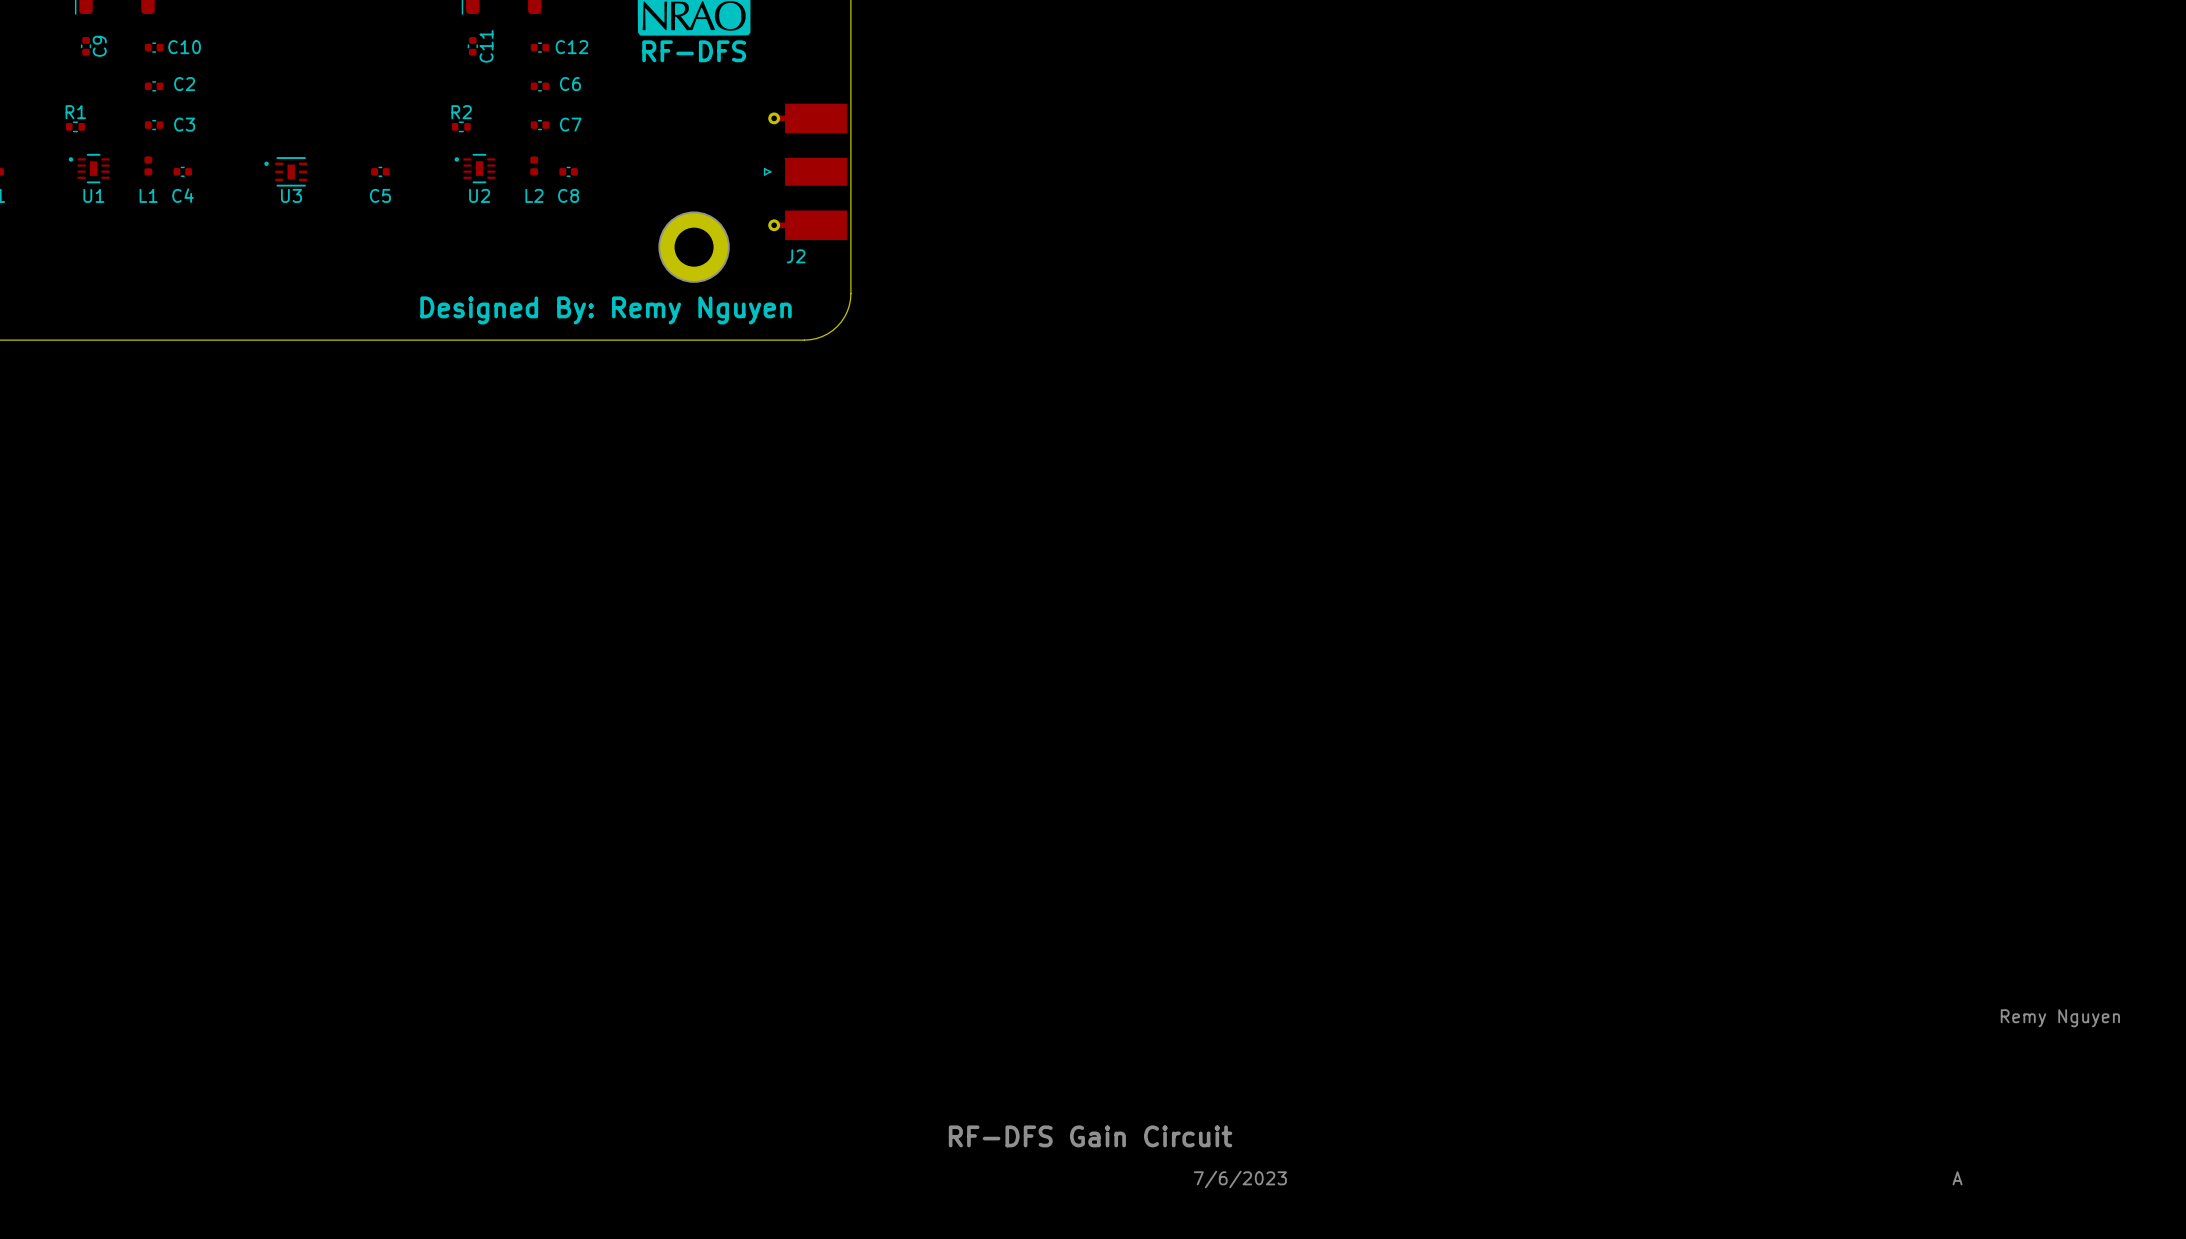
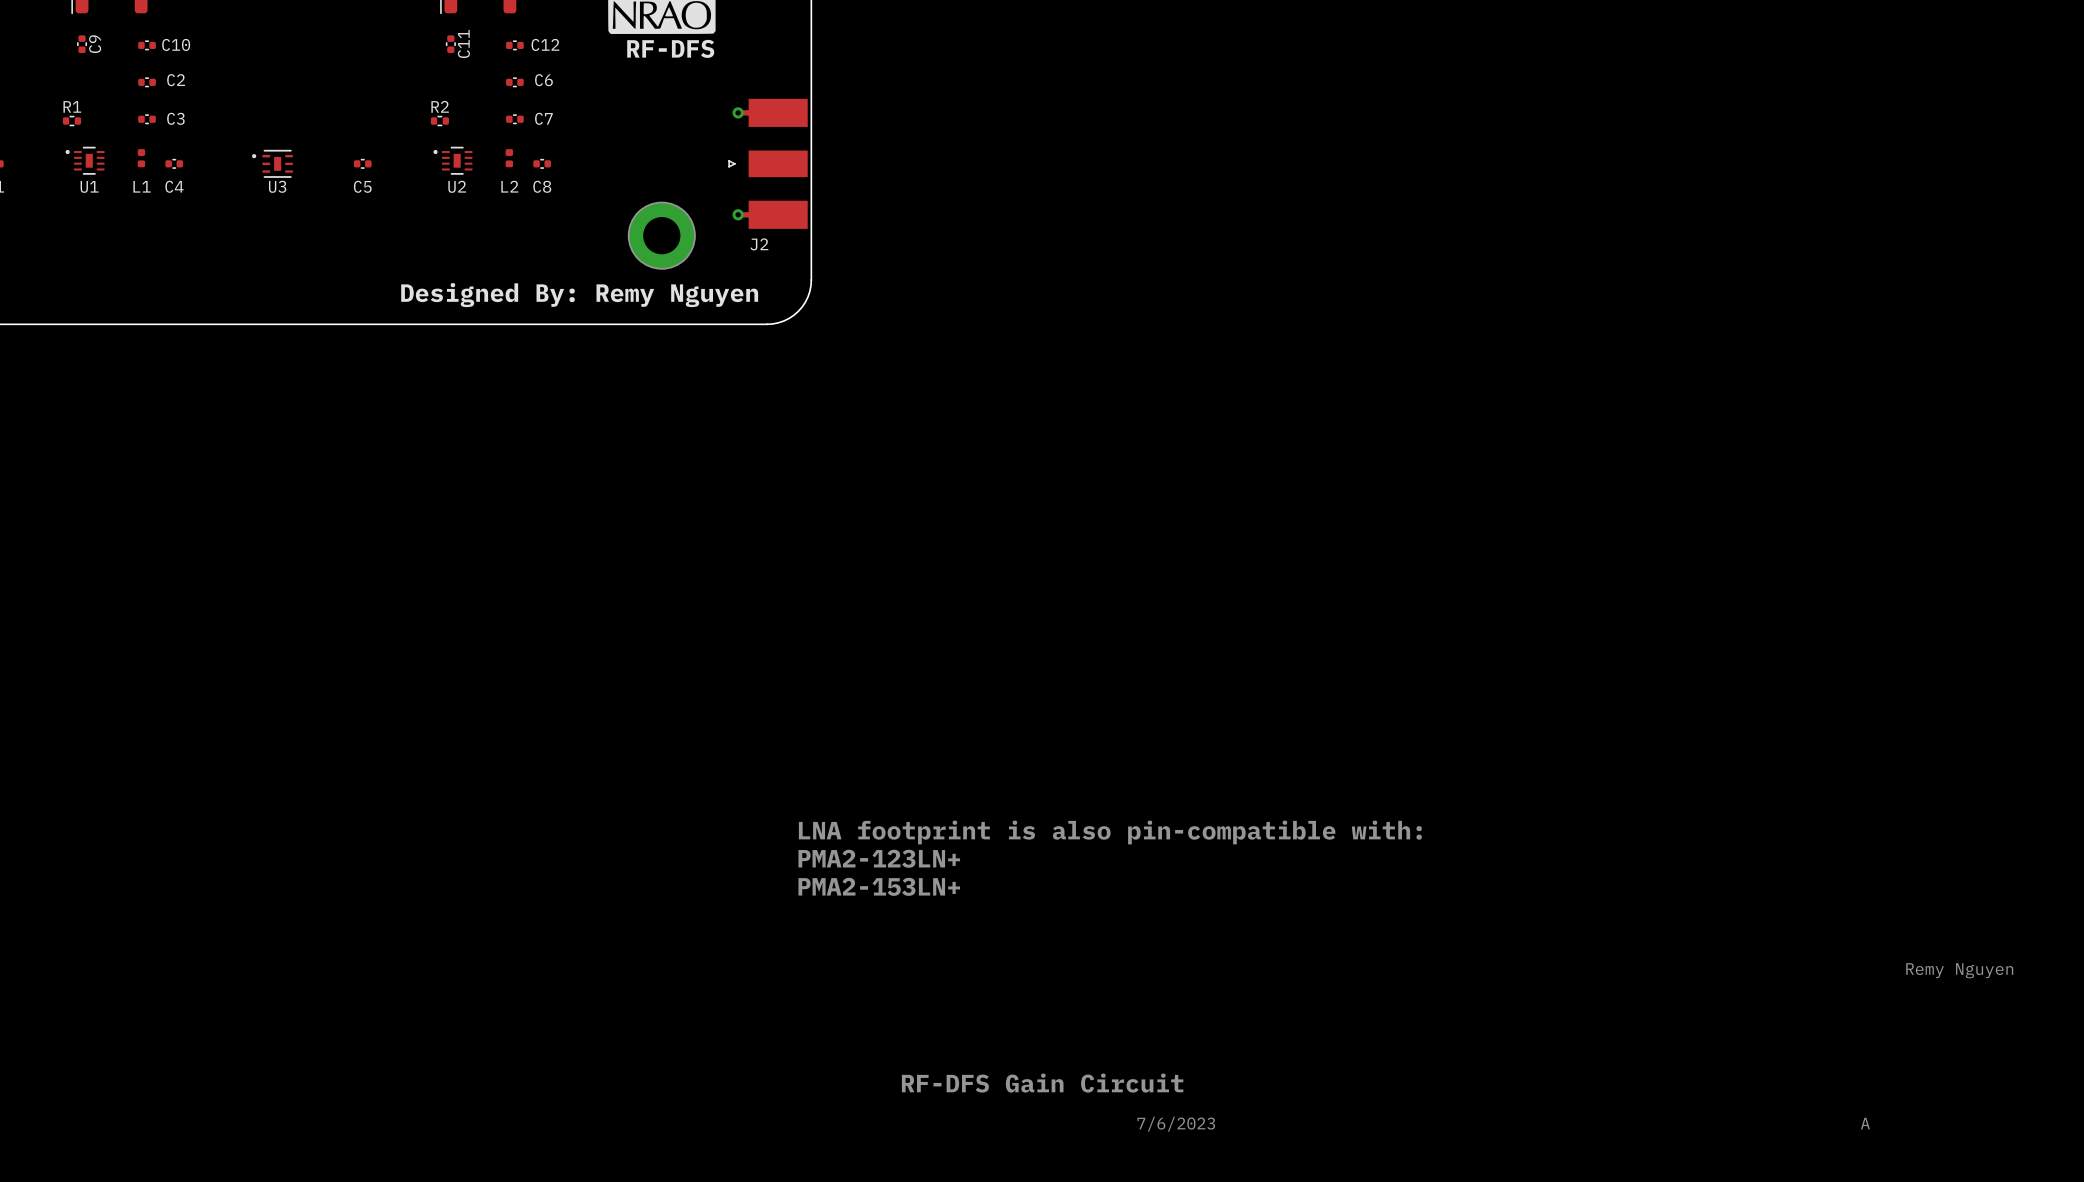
text: none -> LNA footprint is also pin-compatible with: (1110, 832)
text: none -> PMA2-123LN+ (879, 858)
text: none -> PMA2-153LN+ (879, 886)

